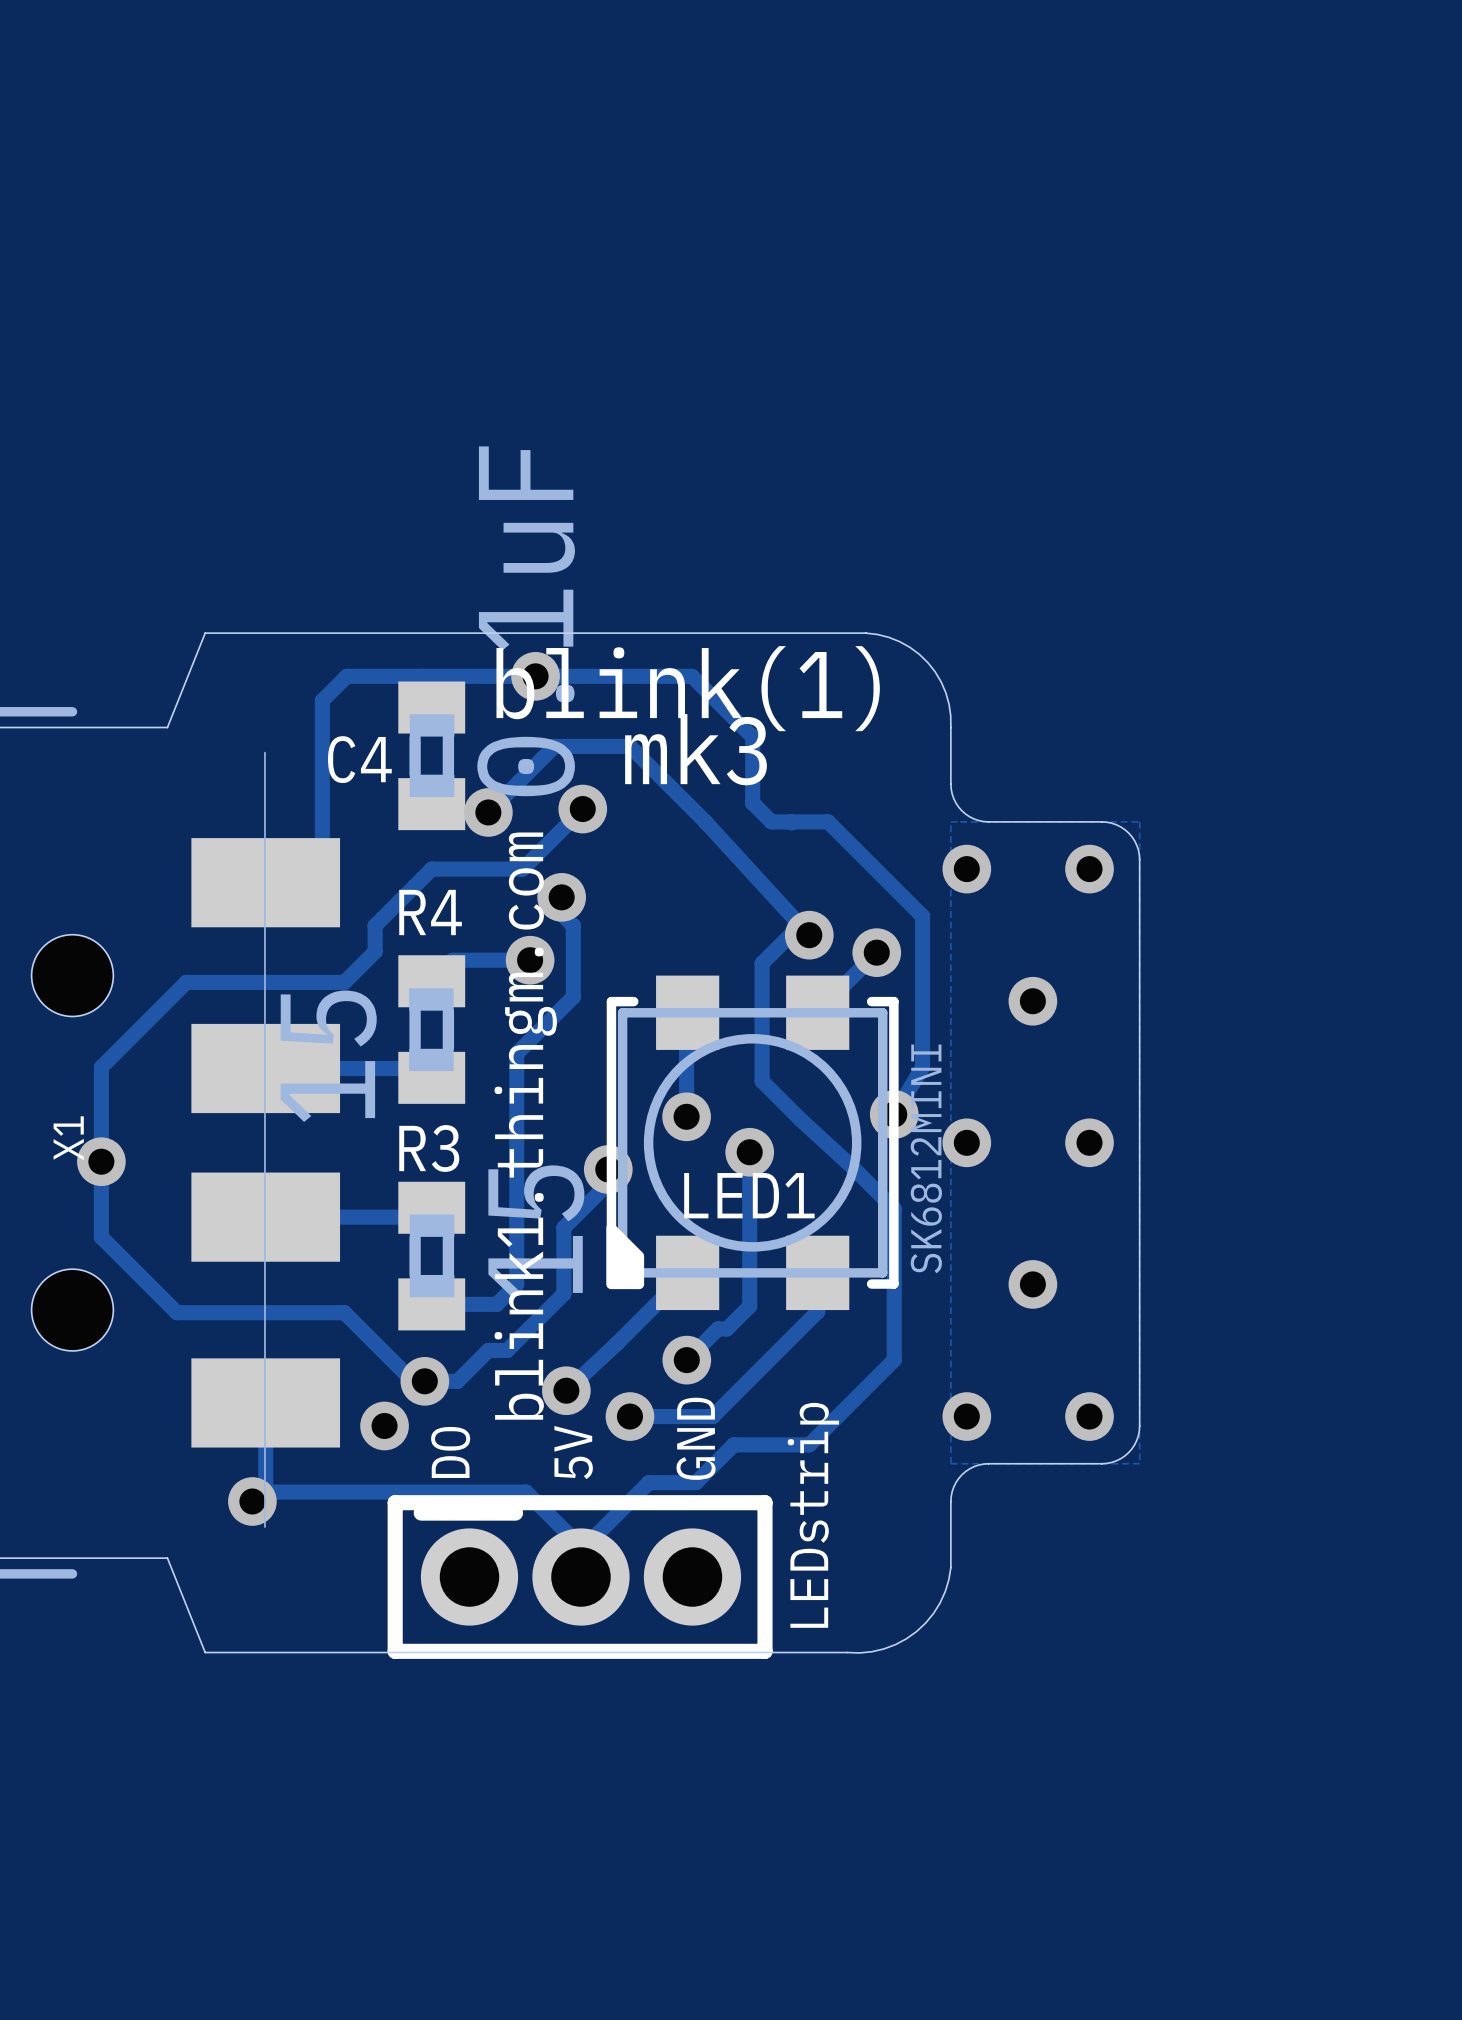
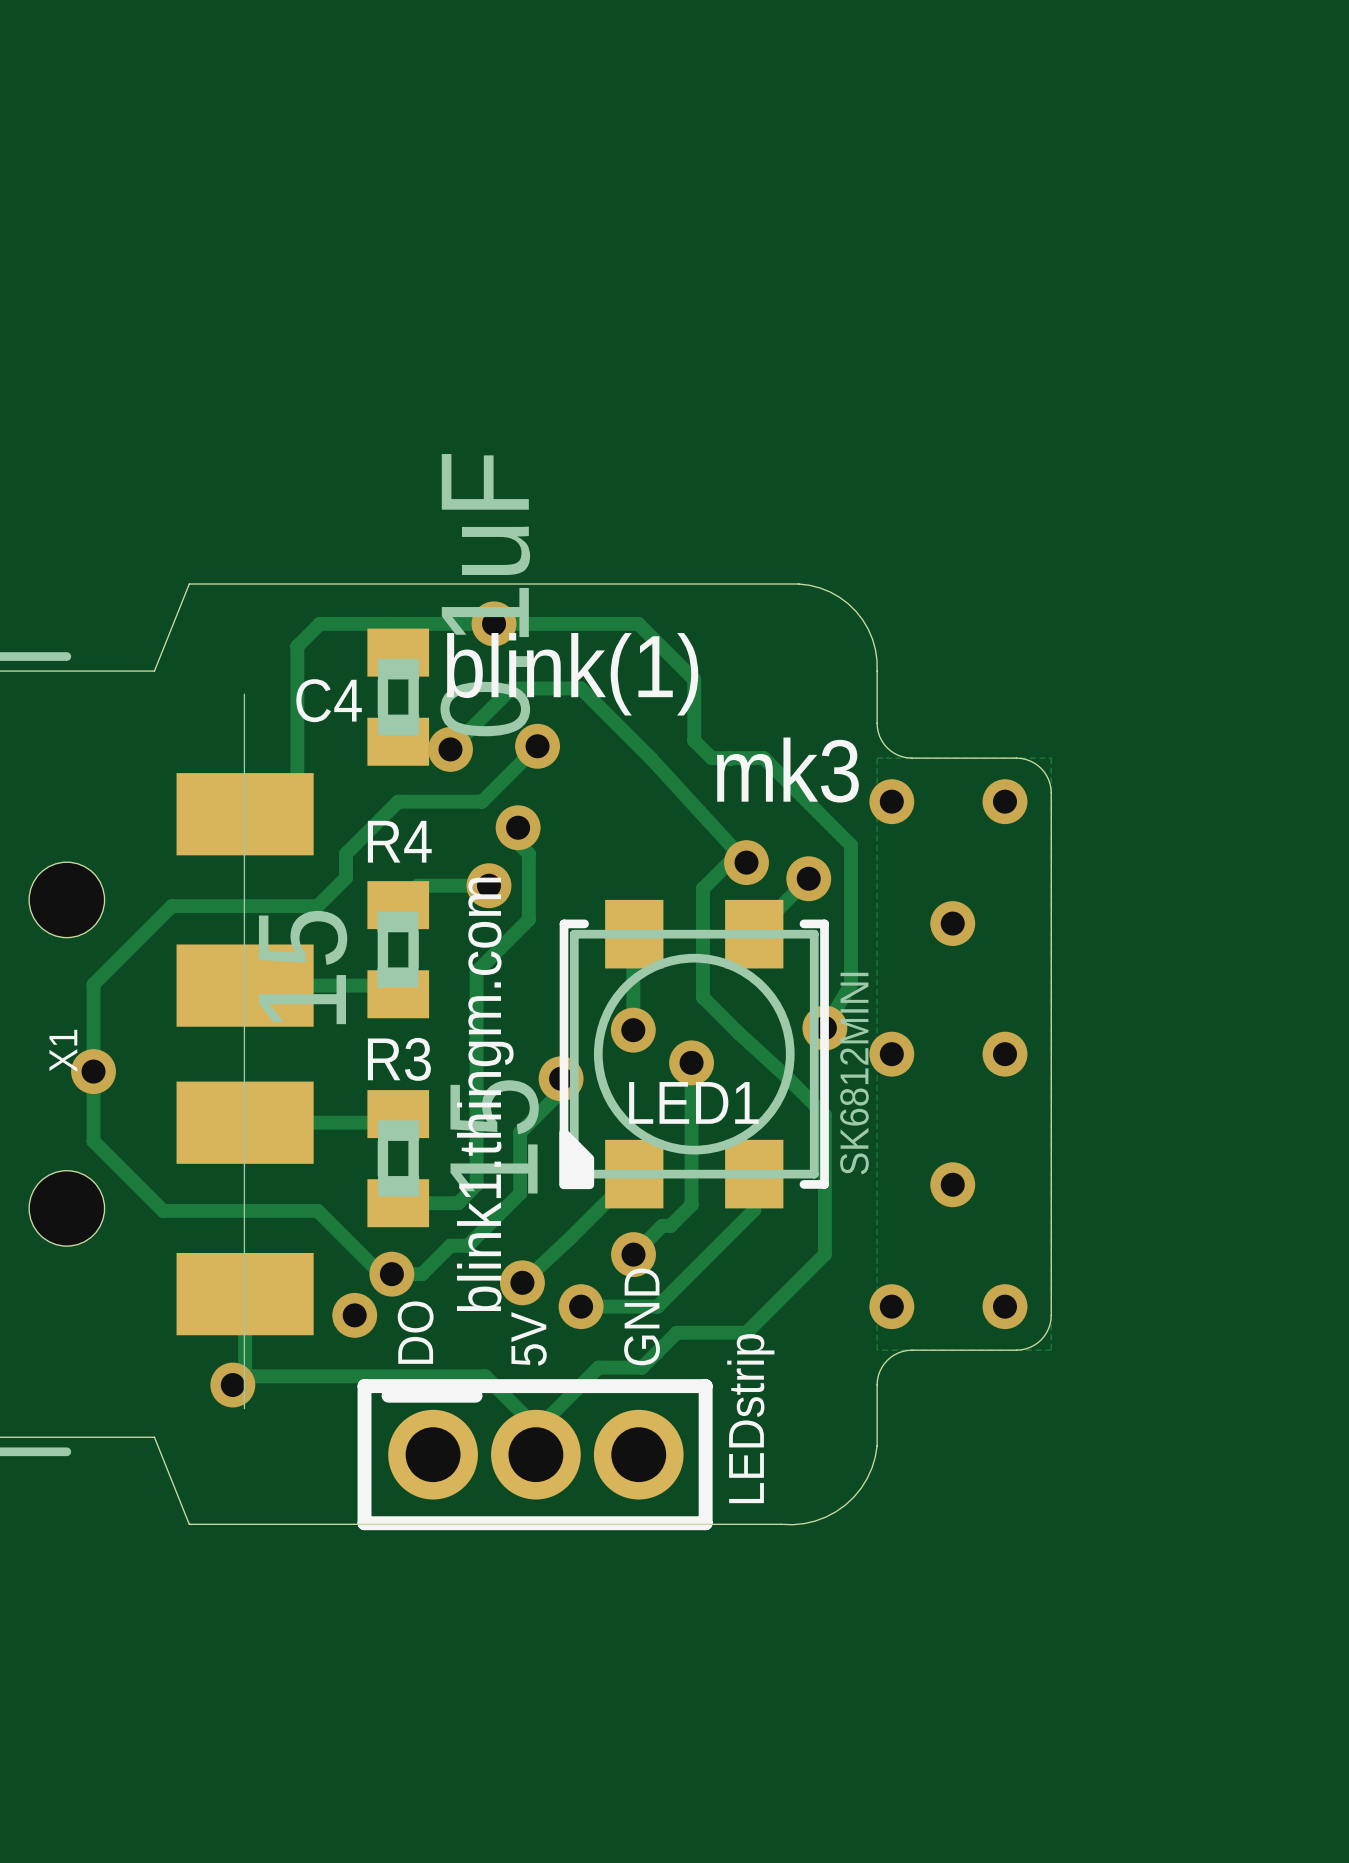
text position: blink(1) (688, 688) -> blink(1) (572, 674)
text position: mk3 (696, 749) -> mk3 (787, 770)

